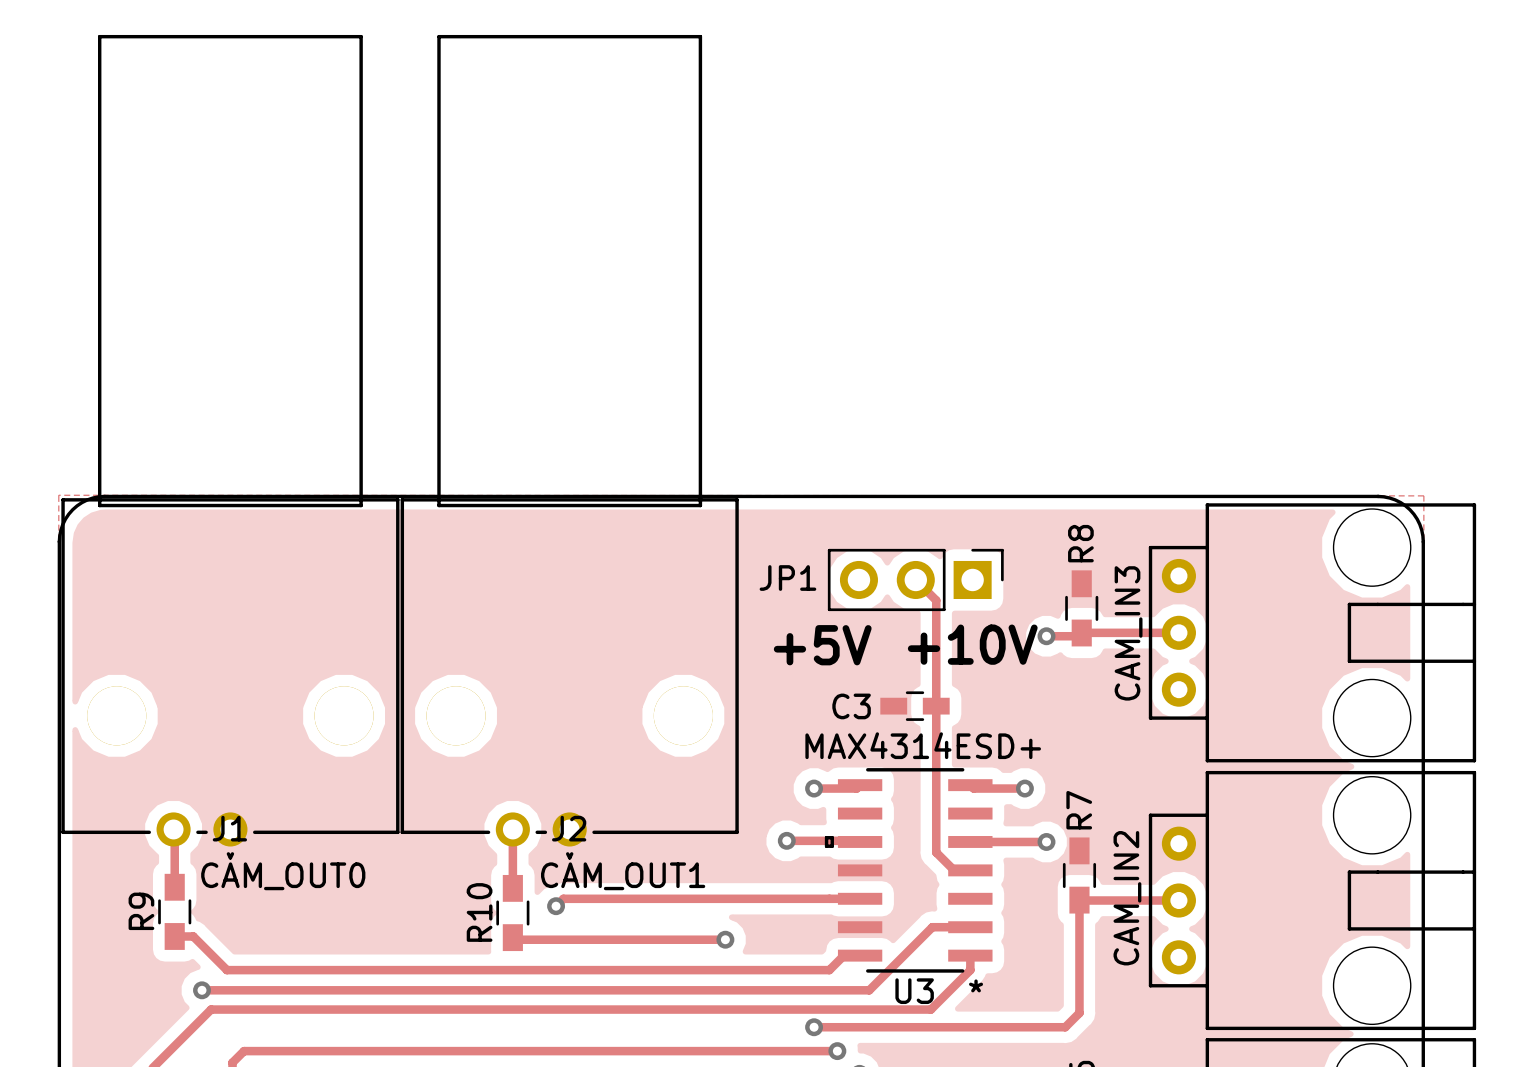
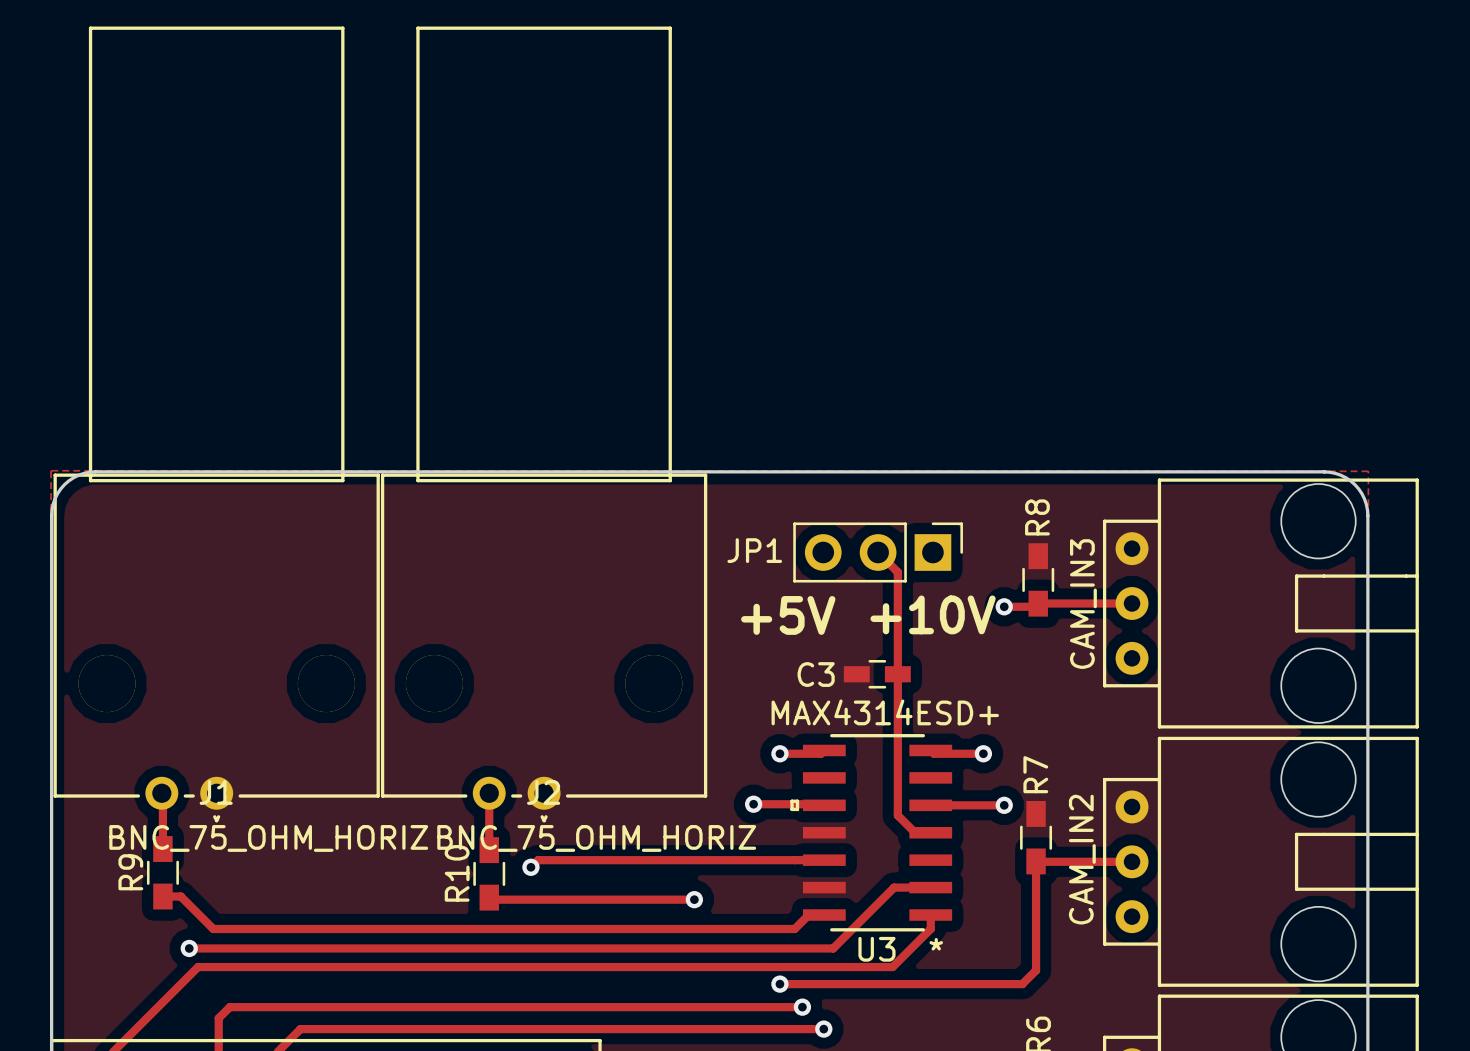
J1 value: CAM_OUT0 (283, 876) -> BNC_75_OHM_HORIZ (268, 838)
J2 value: CAM_OUT1 (623, 876) -> BNC_75_OHM_HORIZ (596, 838)

